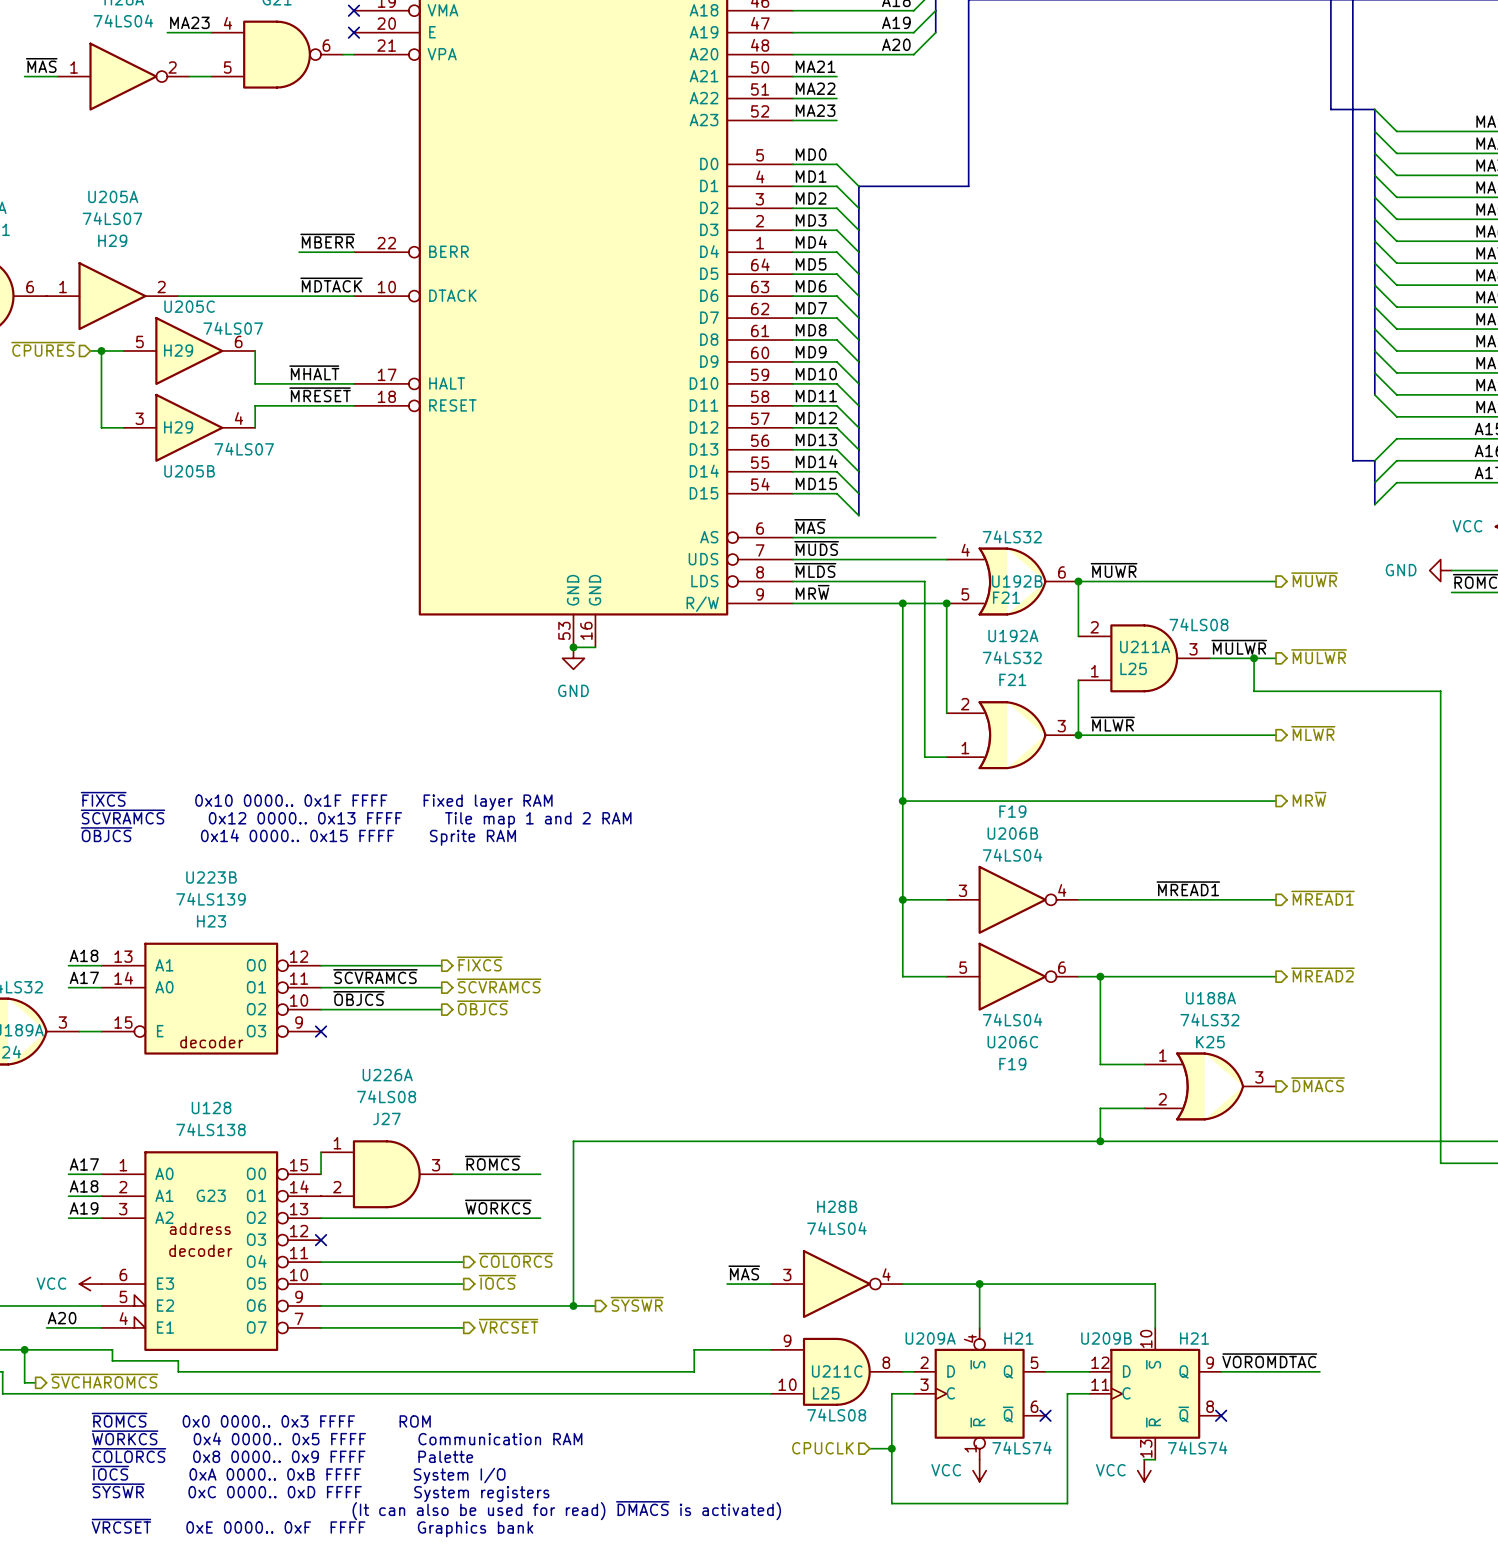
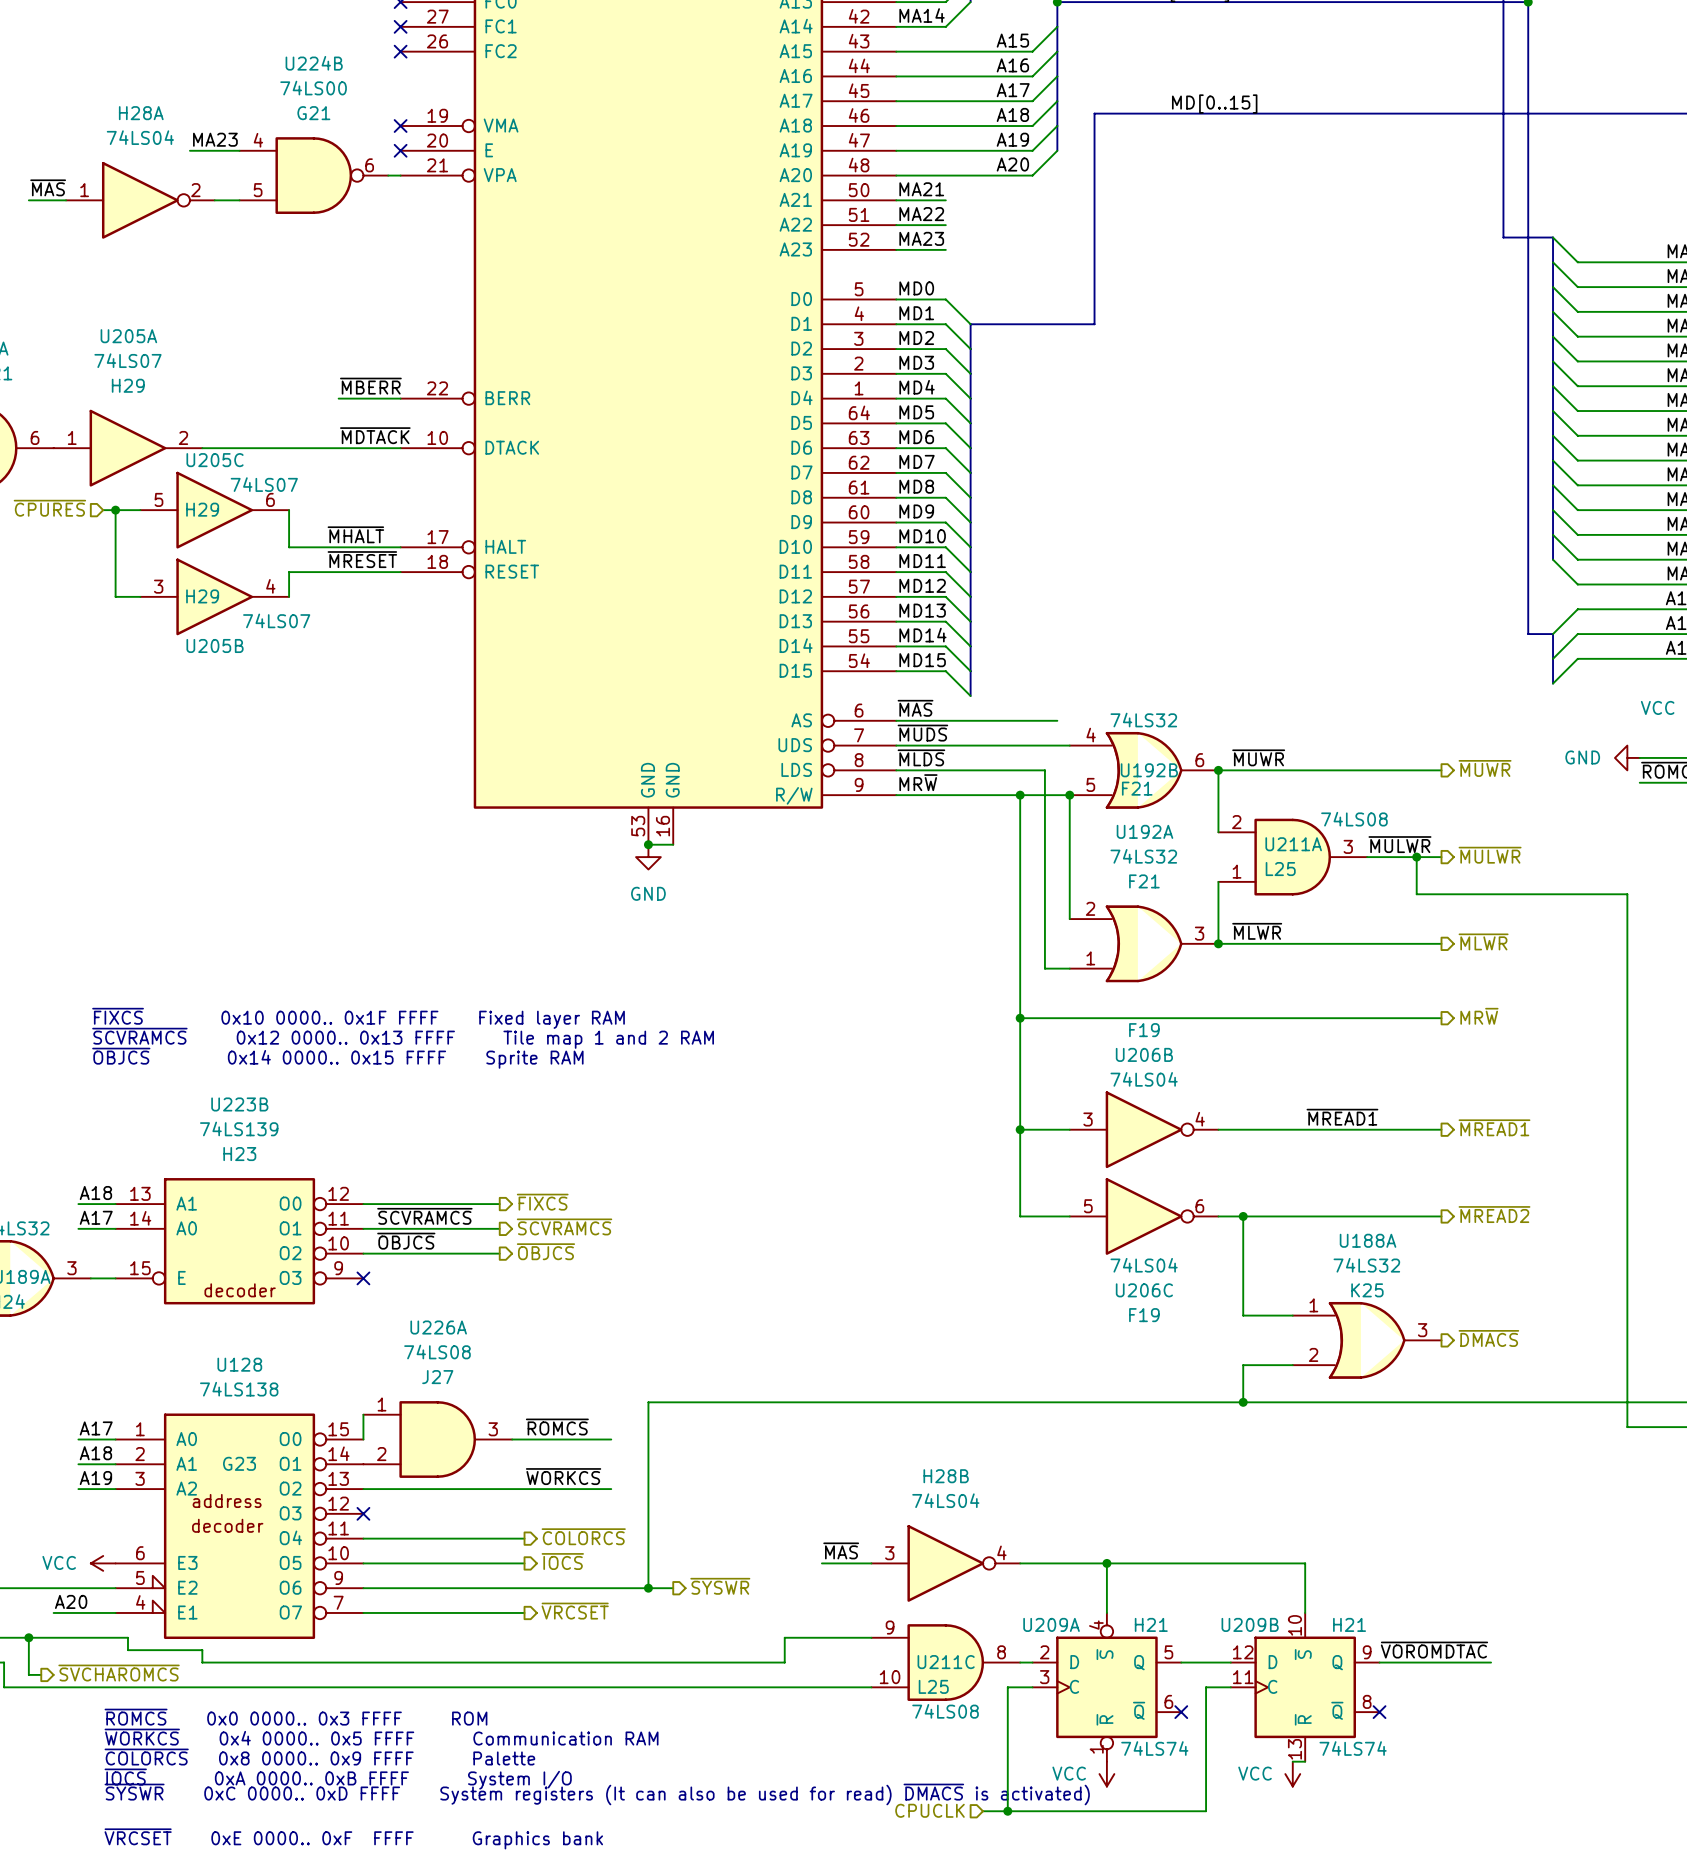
hierarchical label position: CPUCLK (822, 1448) -> CPUCLK (930, 1810)
wire: (869, 1448) (891, 1448) -> (983, 1811) (1007, 1811)
junction: (891, 1448) -> none
text: ~{SYSWR} 0xC 0000.. 0xD FFFF System registers (320, 1492) -> ~{SYSWR} 0xC 0000.. 0xD FFFF System registers (It can also be used for read) ~{DMACS} is activated) (597, 1794)
junction: none -> (1007, 1811)
text: (It can also be used for read) ~{DMACS} is activated) (566, 1510) -> none

